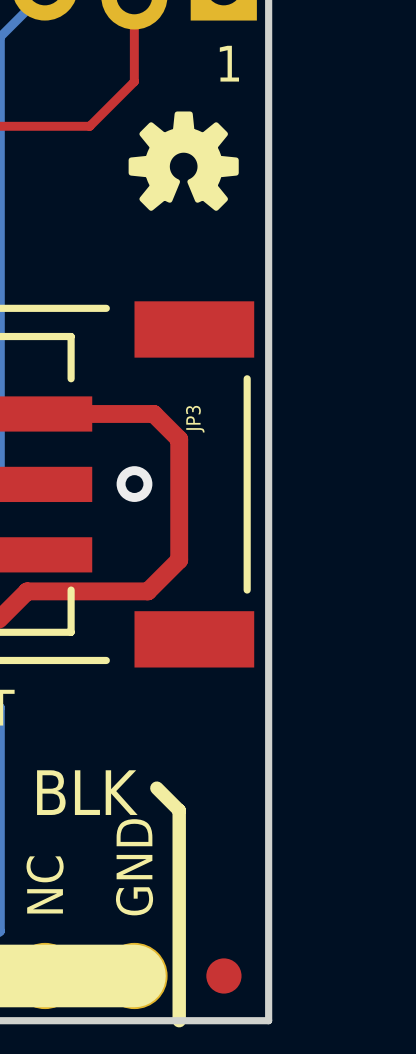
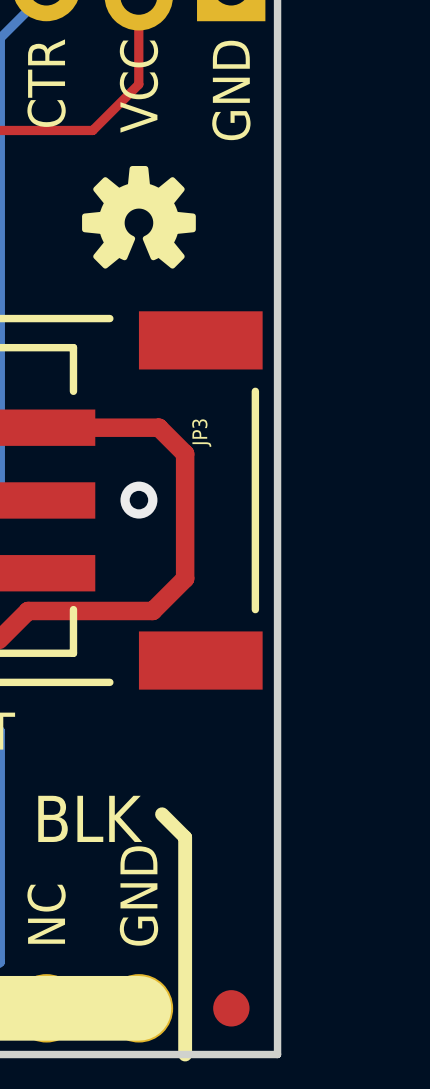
text: 1 (229, 63) -> none
text: none -> CTR (46, 83)
text: none -> VCC (138, 86)
text: none -> GND (231, 90)
drawing position: (183, 161) -> (138, 217)

